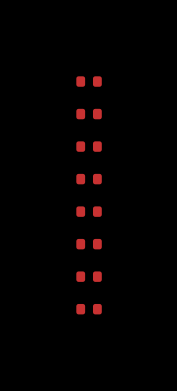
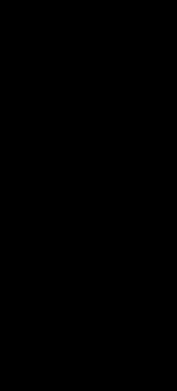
part: (89, 81) -> none
part: (89, 114) -> none
part: (89, 146) -> none
part: (89, 179) -> none
part: (89, 211) -> none
part: (89, 244) -> none
part: (89, 276) -> none
part: (89, 309) -> none

